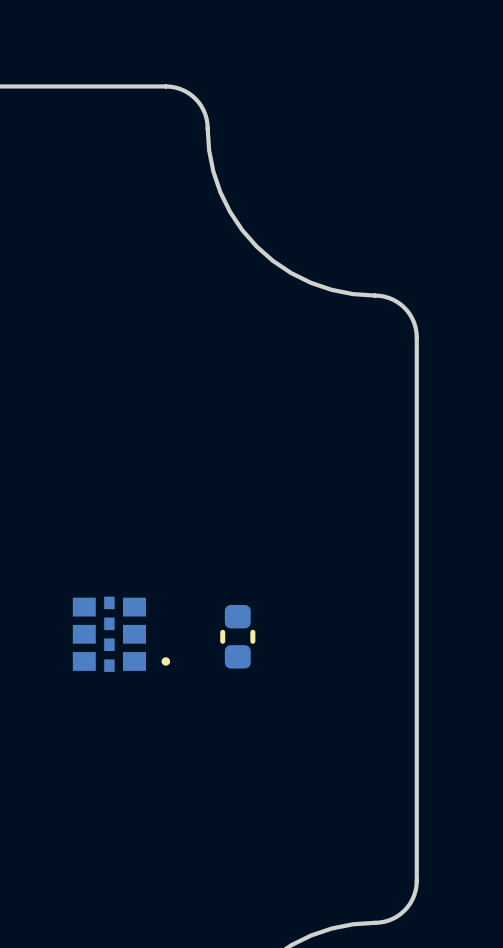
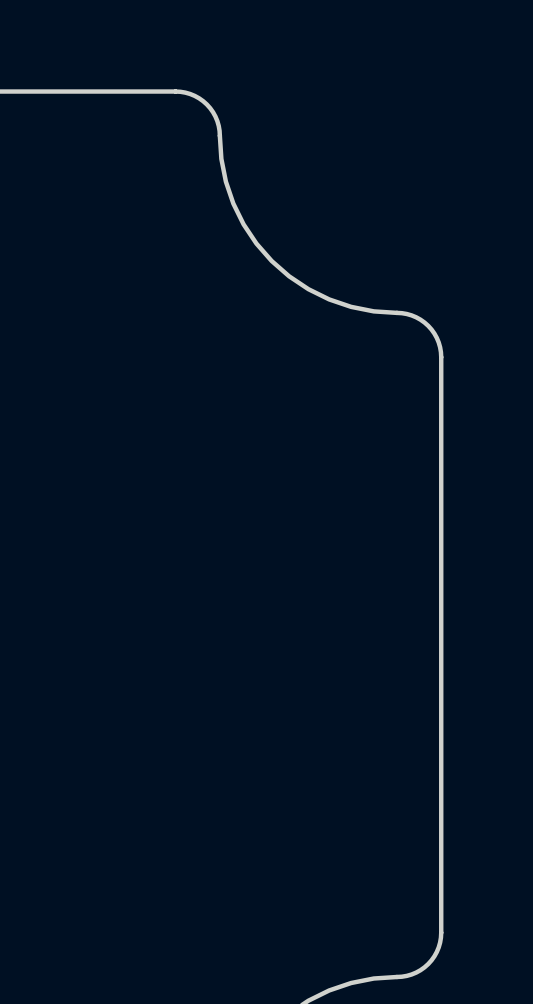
part: (121, 634) -> none
part: (237, 636) -> none

